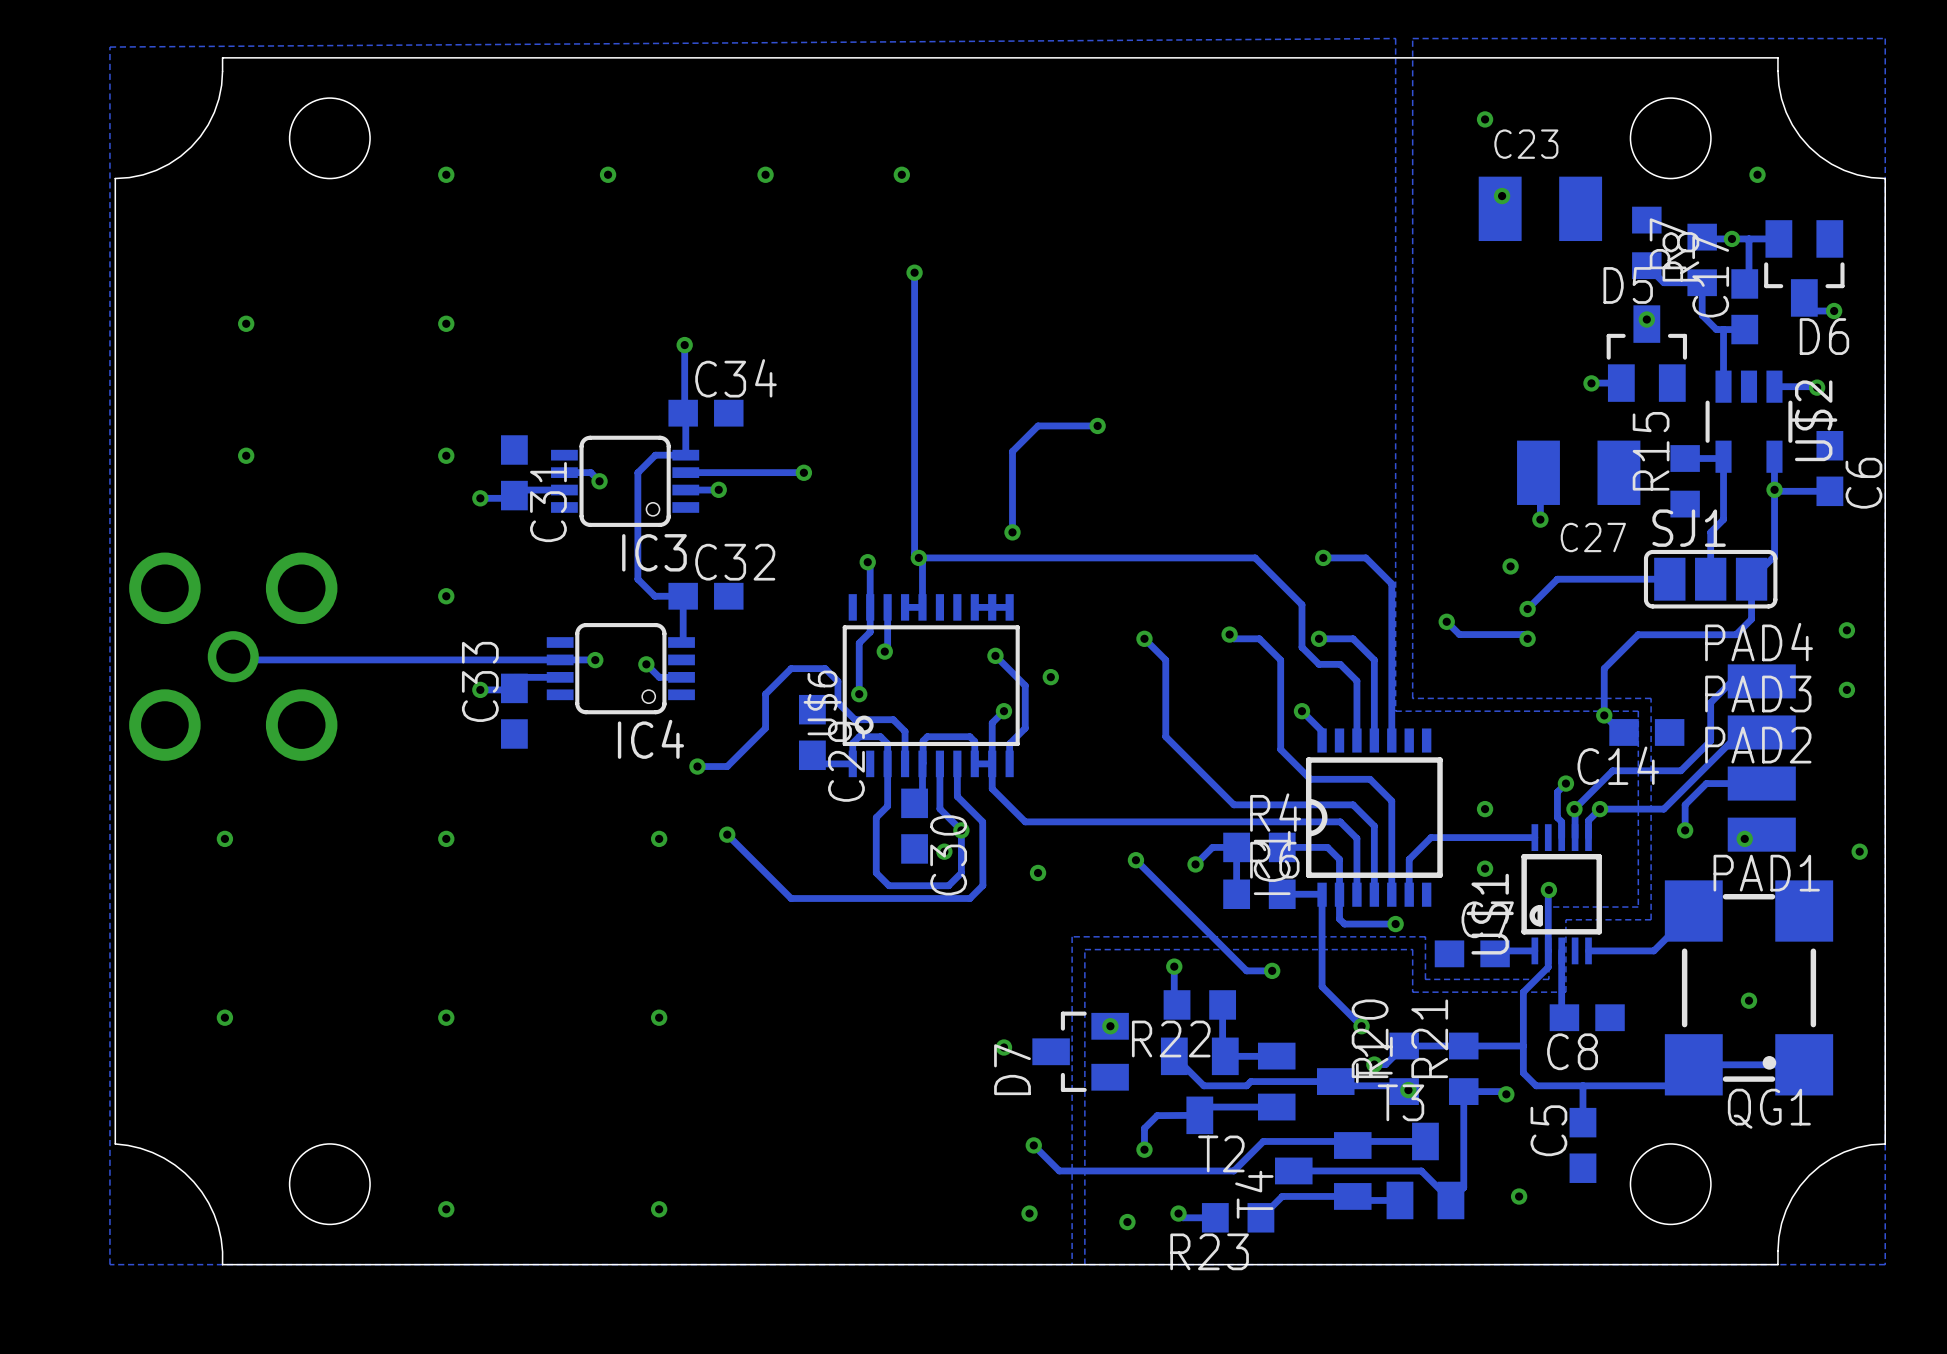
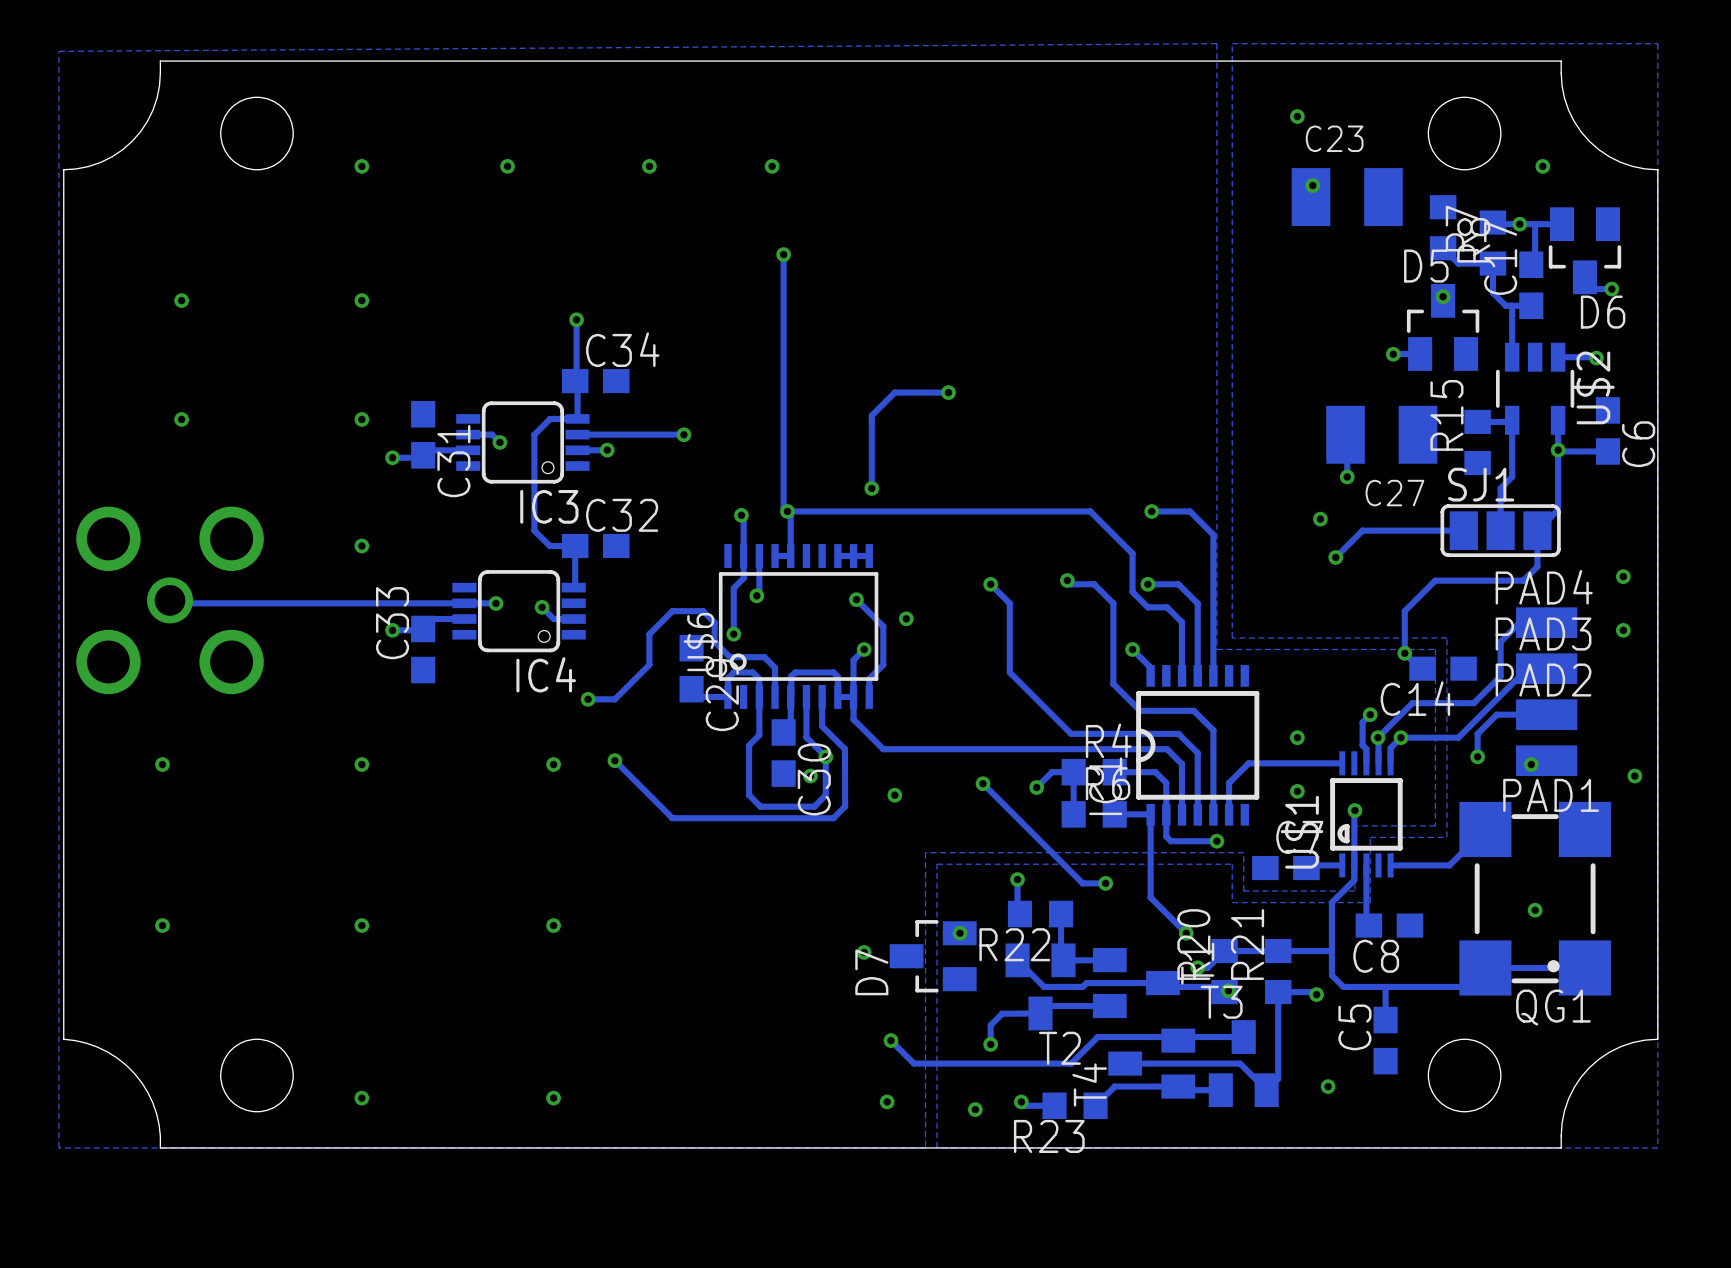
track: (1446, 621) (1459, 634) (1523, 634) (1527, 638) -> none
via: (1446, 621) -> none
via: (1527, 638) -> none

